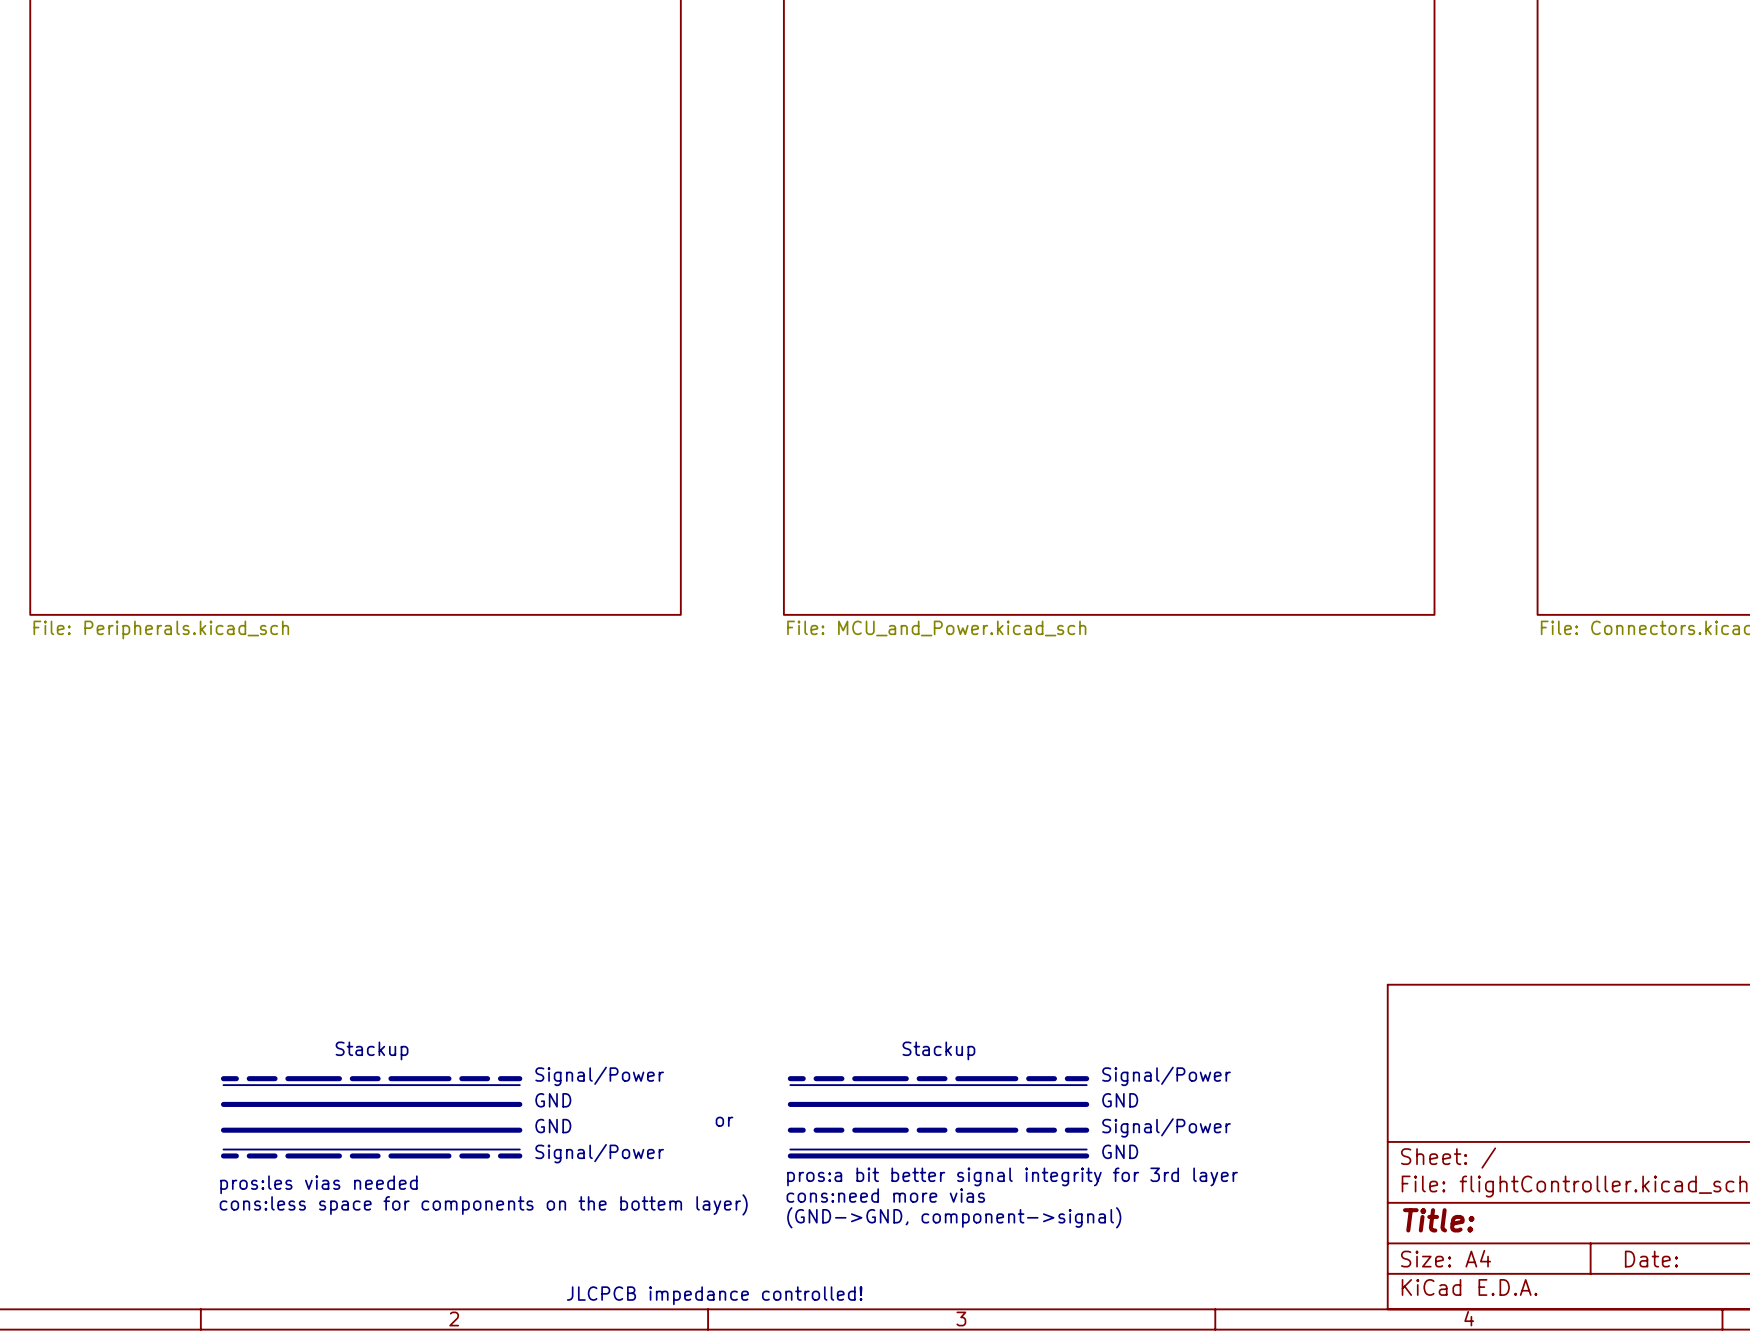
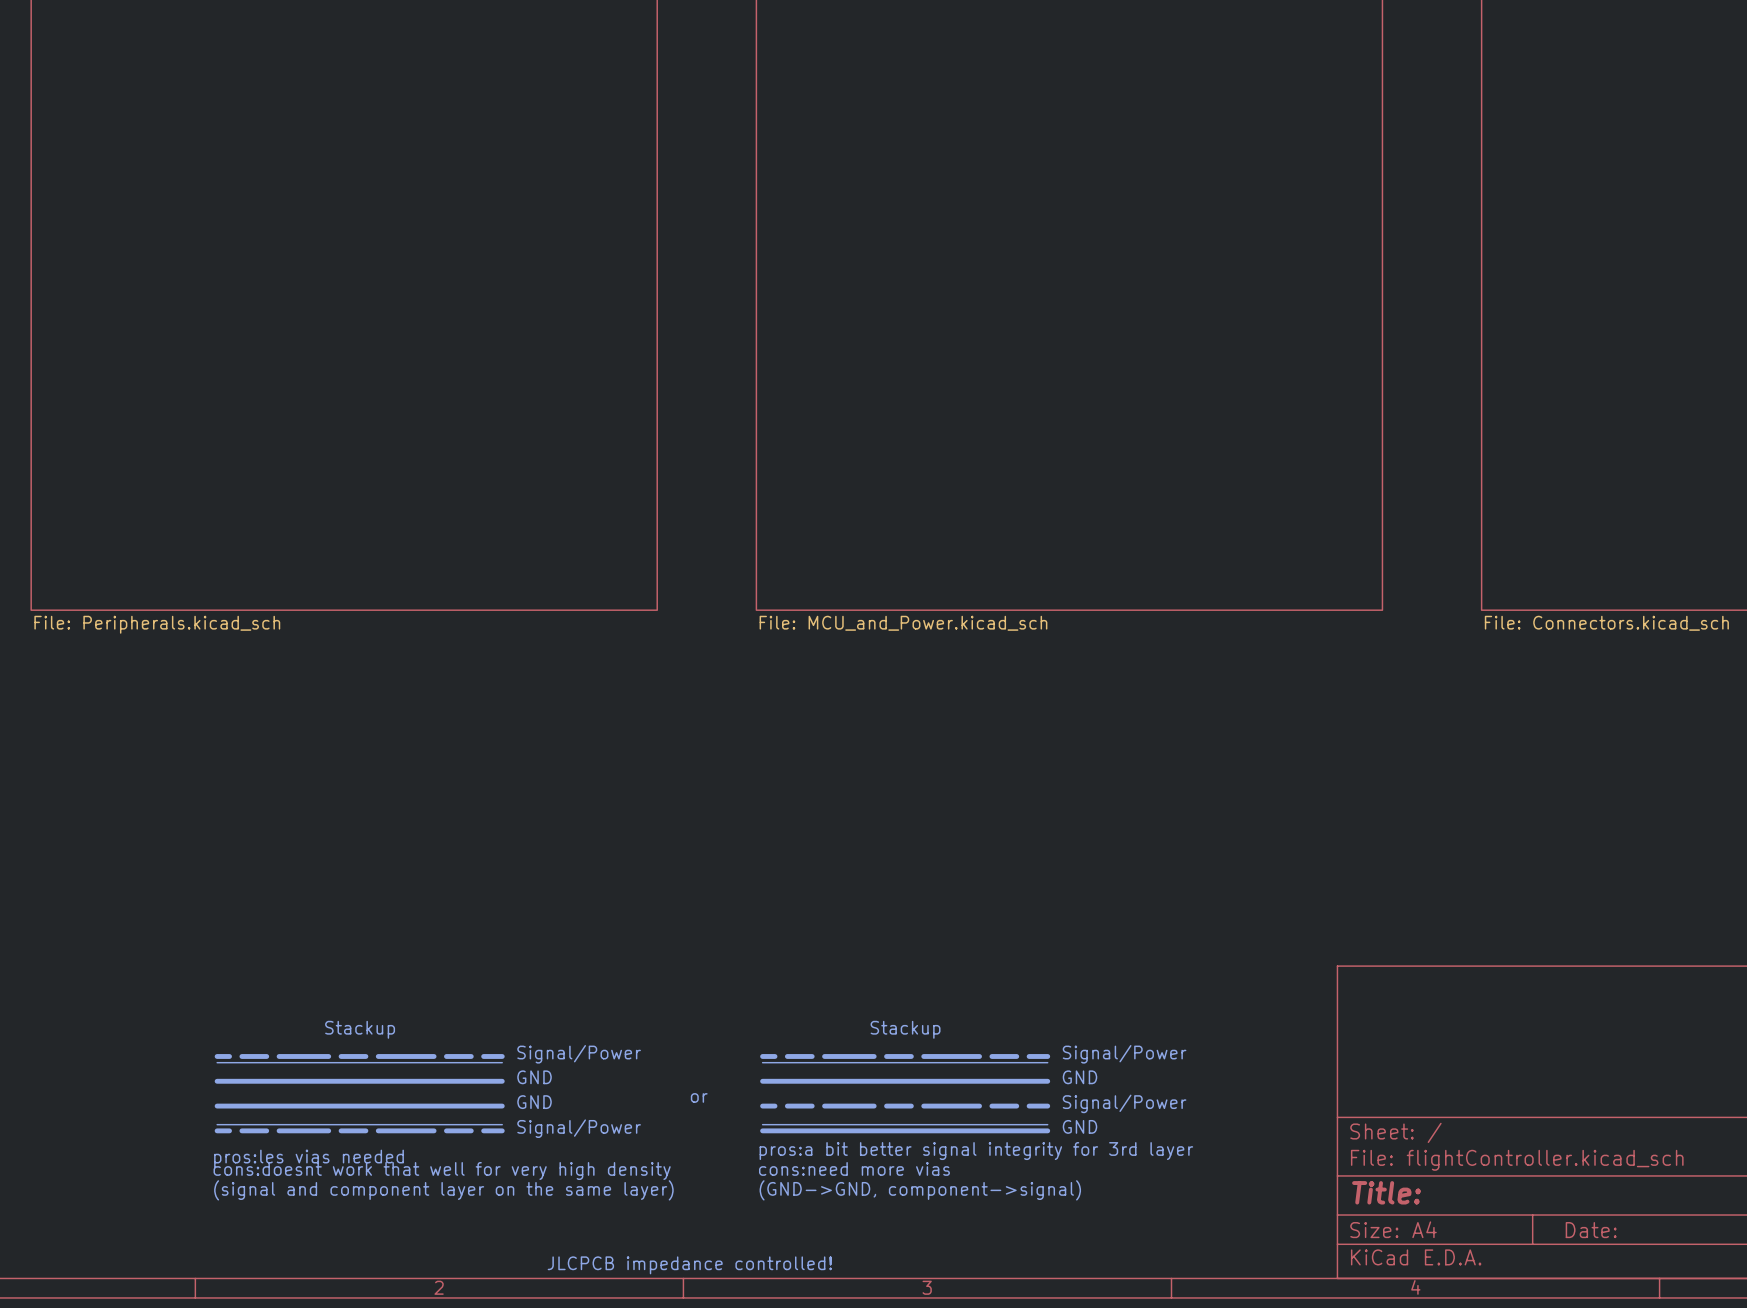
text: none -> cons:doesnt work that well for very high density (442, 1171)
text: cons:less space for components on the bottem layer) (483, 1204) -> (signal and component layer on the same layer) (443, 1190)

